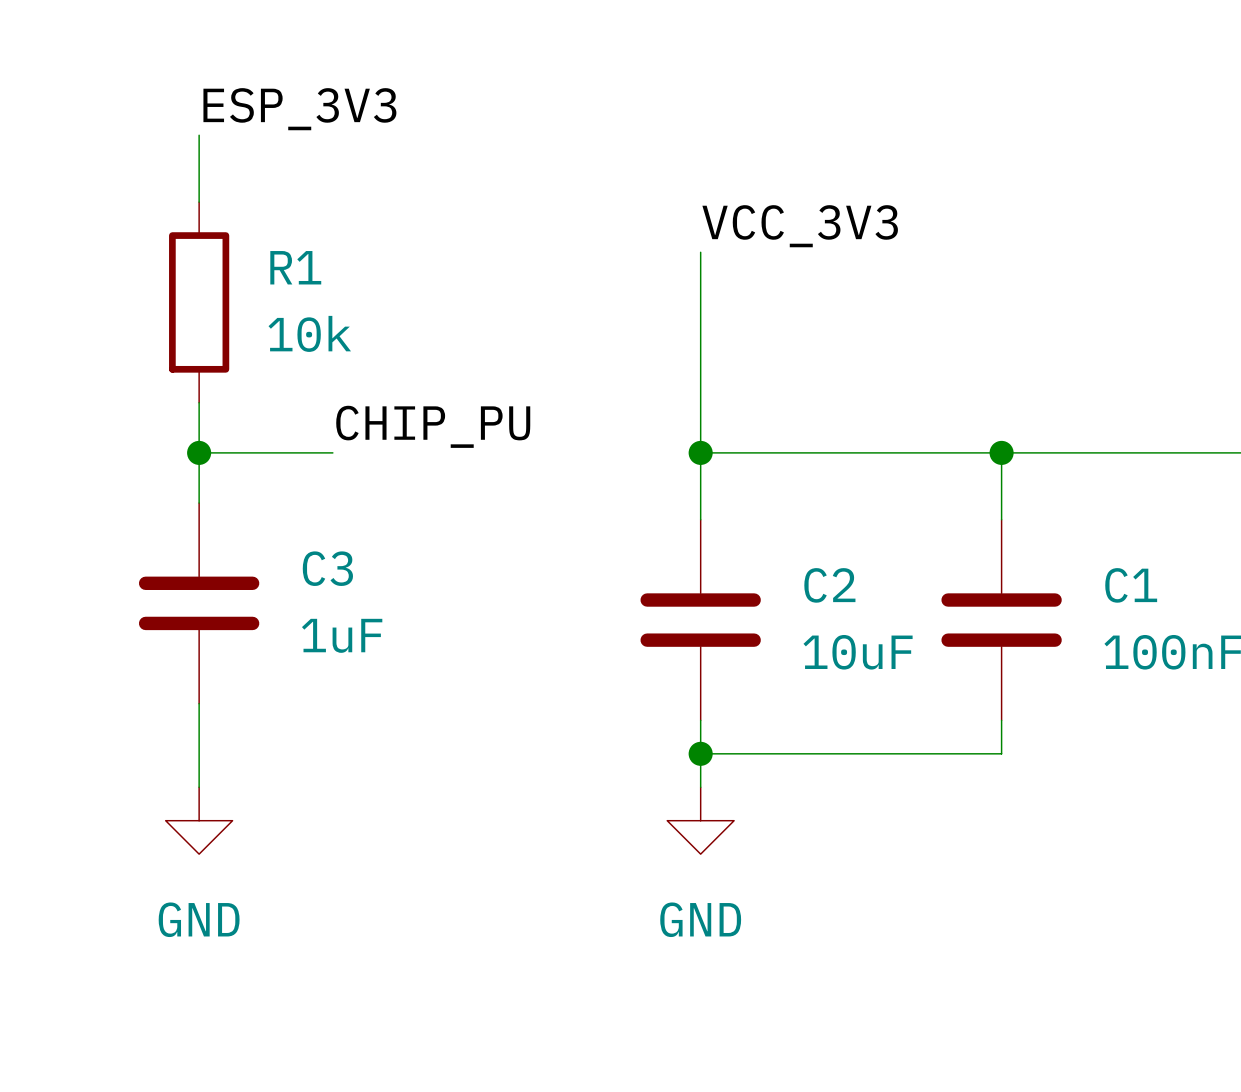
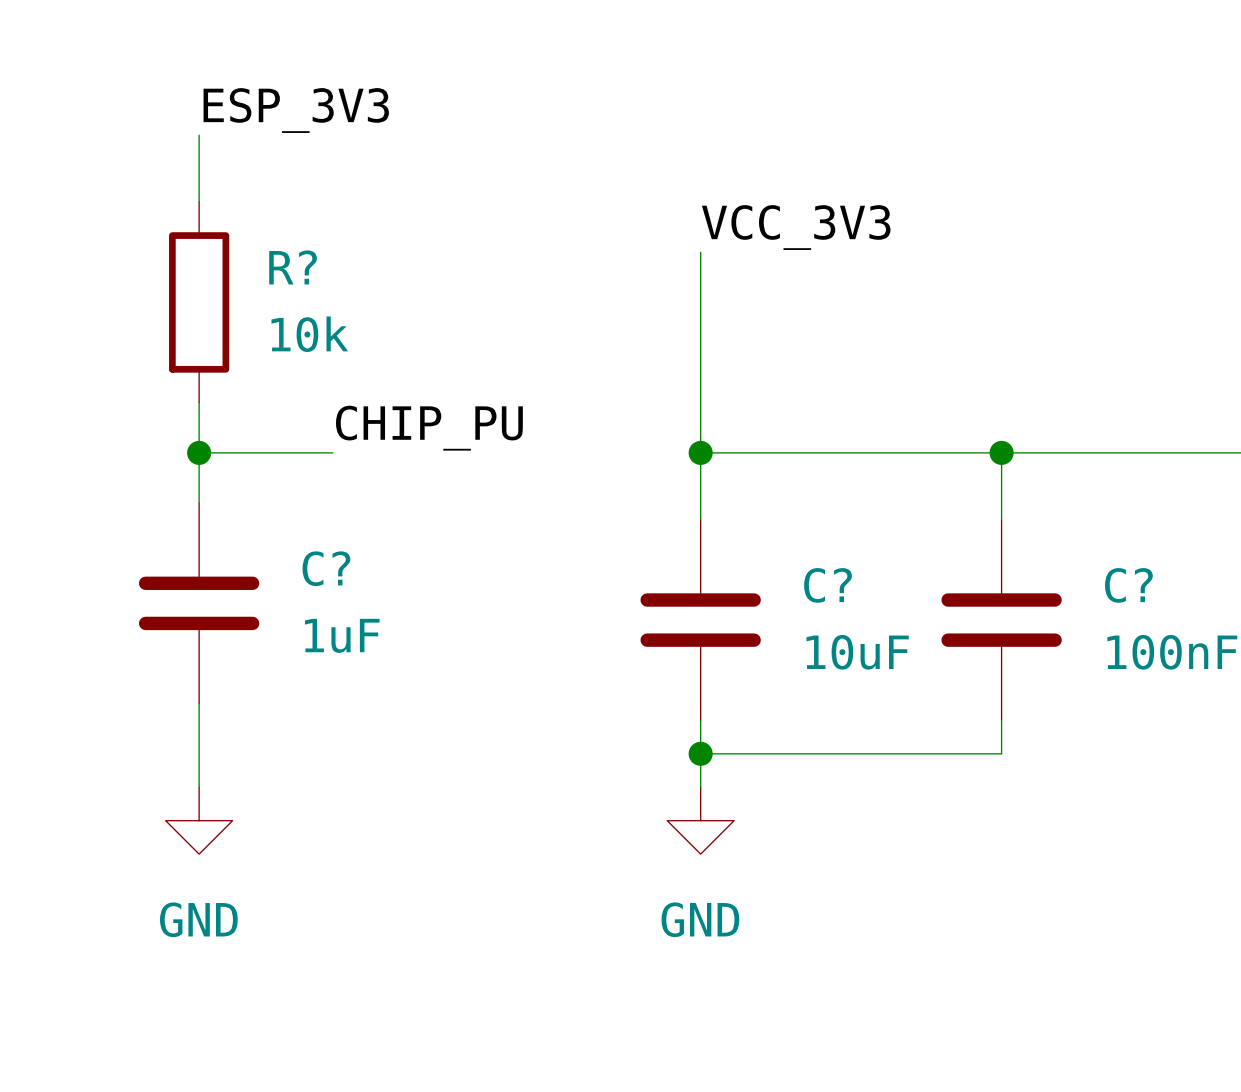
R1 name: R1 (295, 267) -> R? (293, 267)
C3 name: C3 (327, 568) -> C? (326, 568)
C2 name: C2 (829, 585) -> C? (827, 585)
C1 name: C1 (1131, 585) -> C? (1128, 585)

